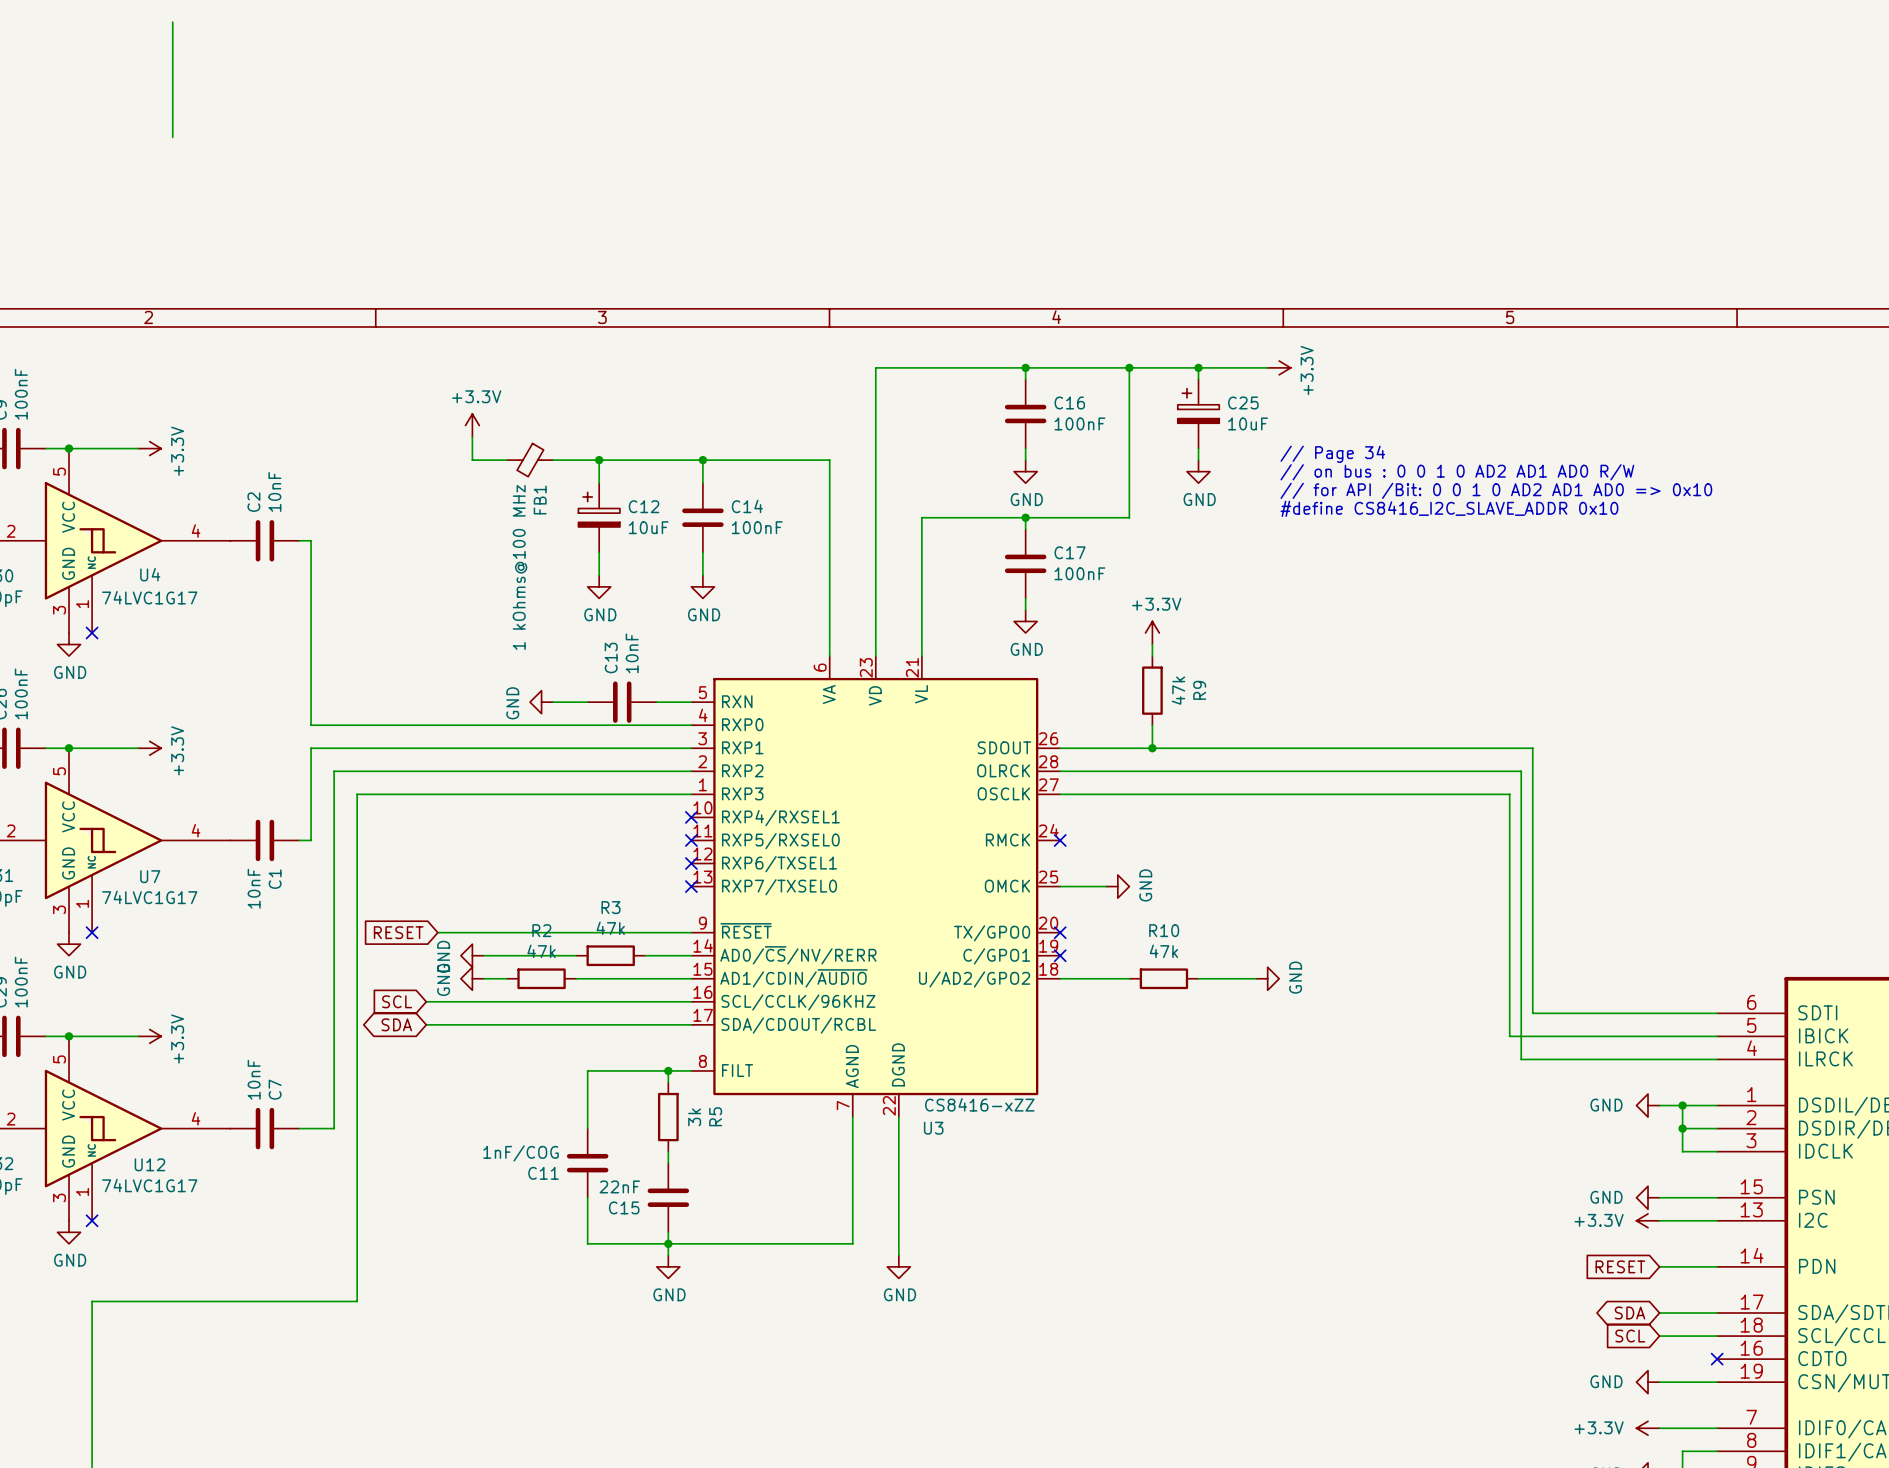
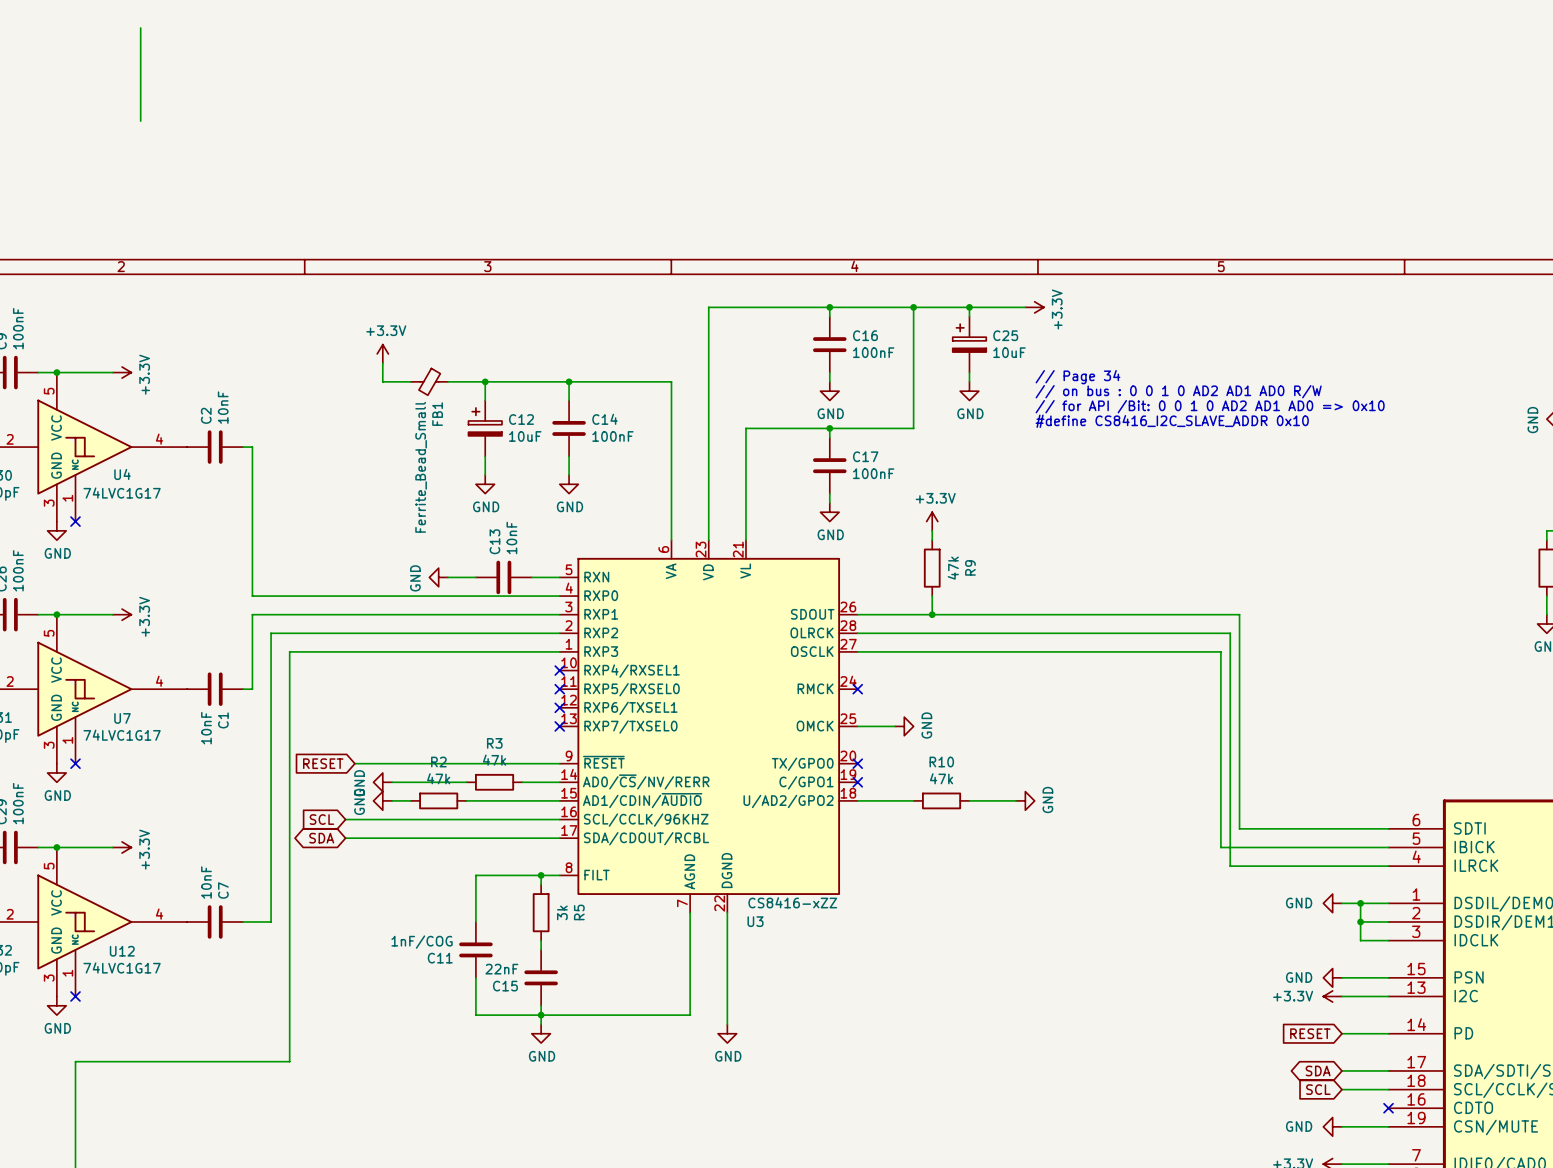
FB1 value: 1 kOhms@100 MHz (520, 567) -> Ferrite_Bead_Small (421, 467)
part pin name: PDN (1817, 1266) -> PD (1463, 1033)

